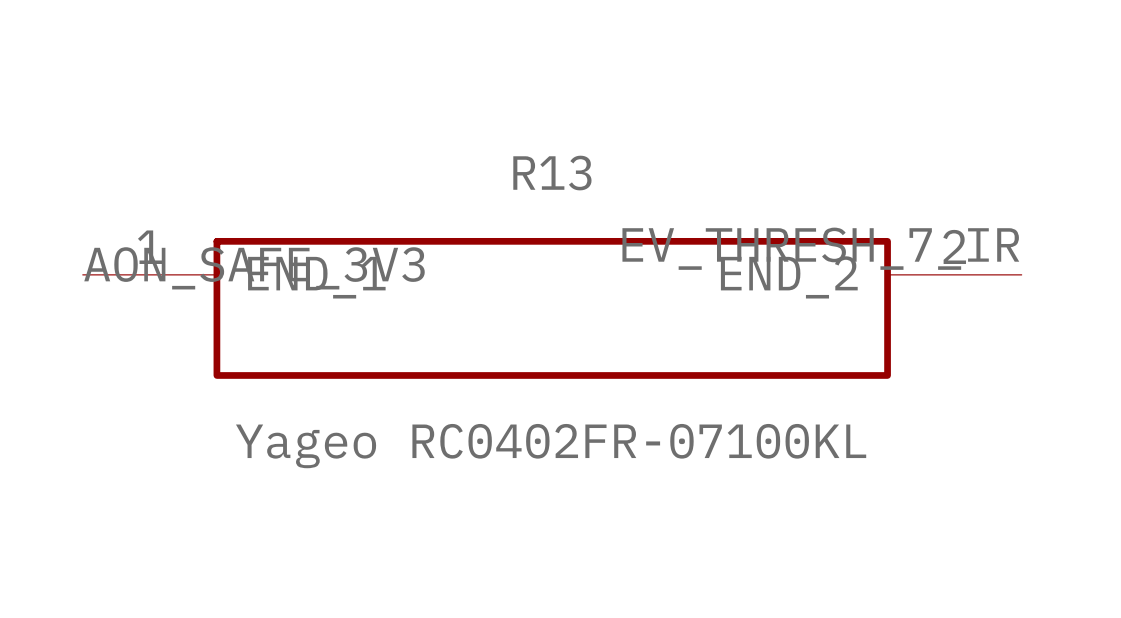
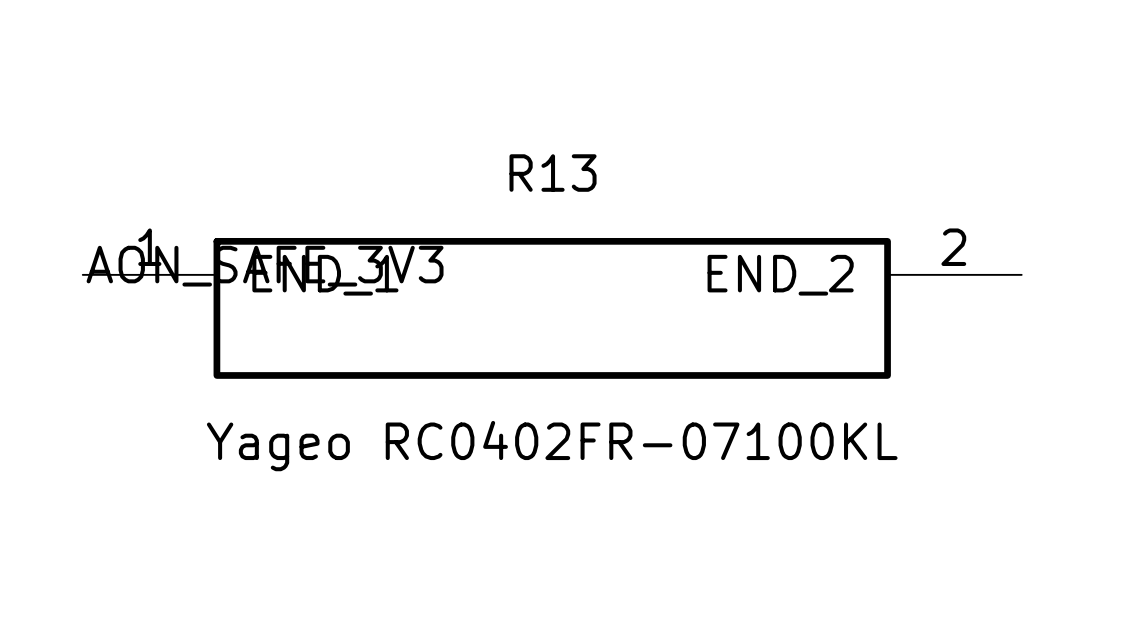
label: EV_THRESH_7_IR (820, 248) -> none

